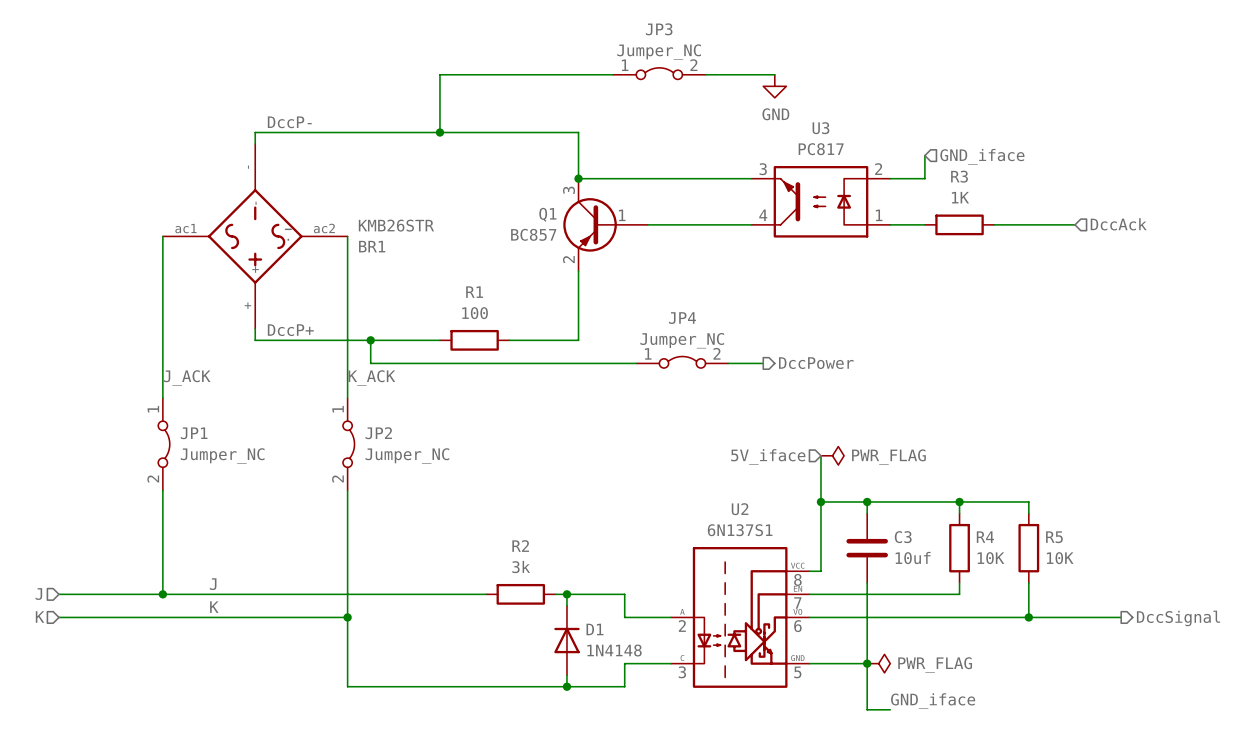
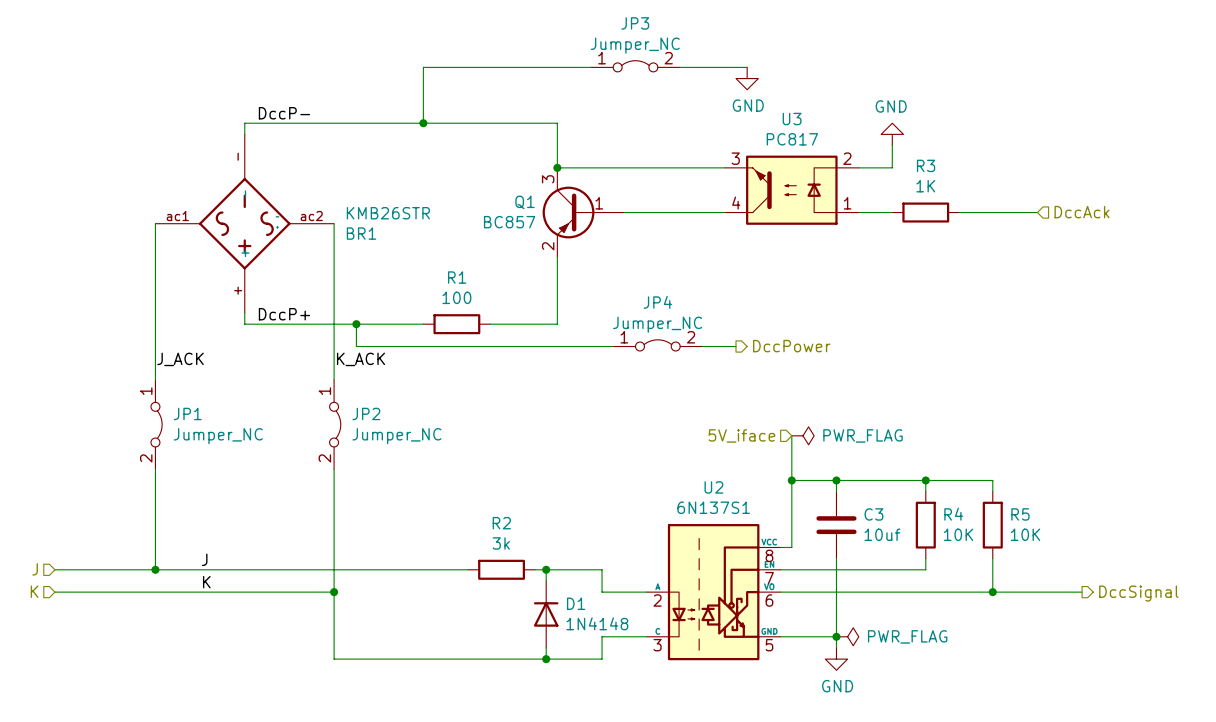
power symbol: none -> GND (892, 134)
hierarchical label: GND_iface (982, 156) -> none
wire: (867, 675) (867, 709) (890, 709) -> none
power symbol: none -> GND (836, 659)
label: GND_iface (933, 701) -> none

